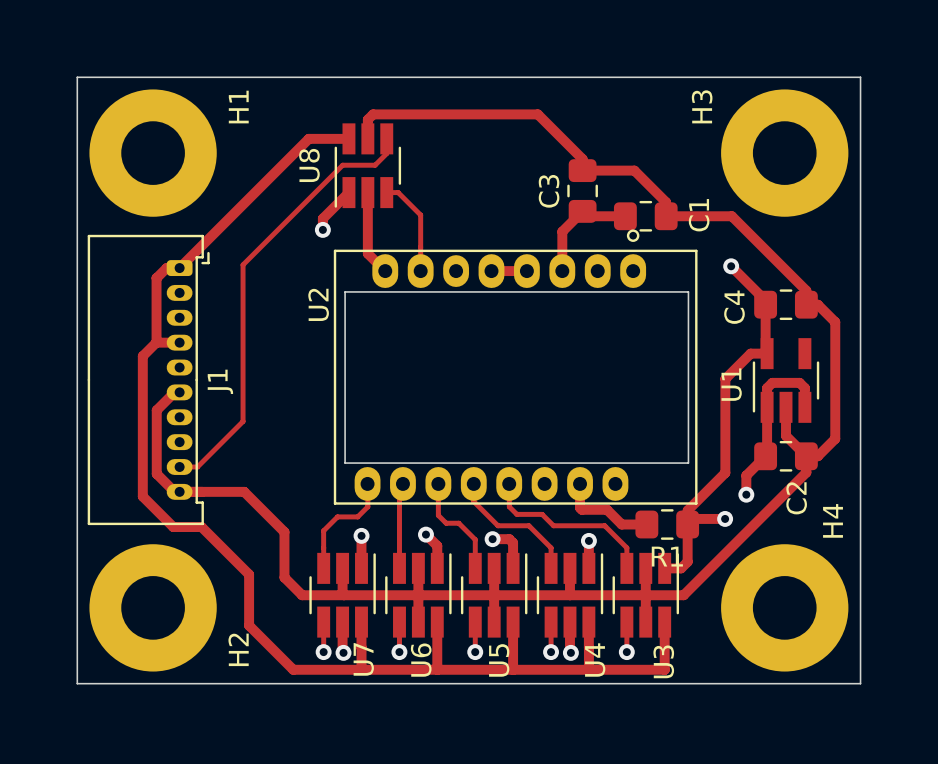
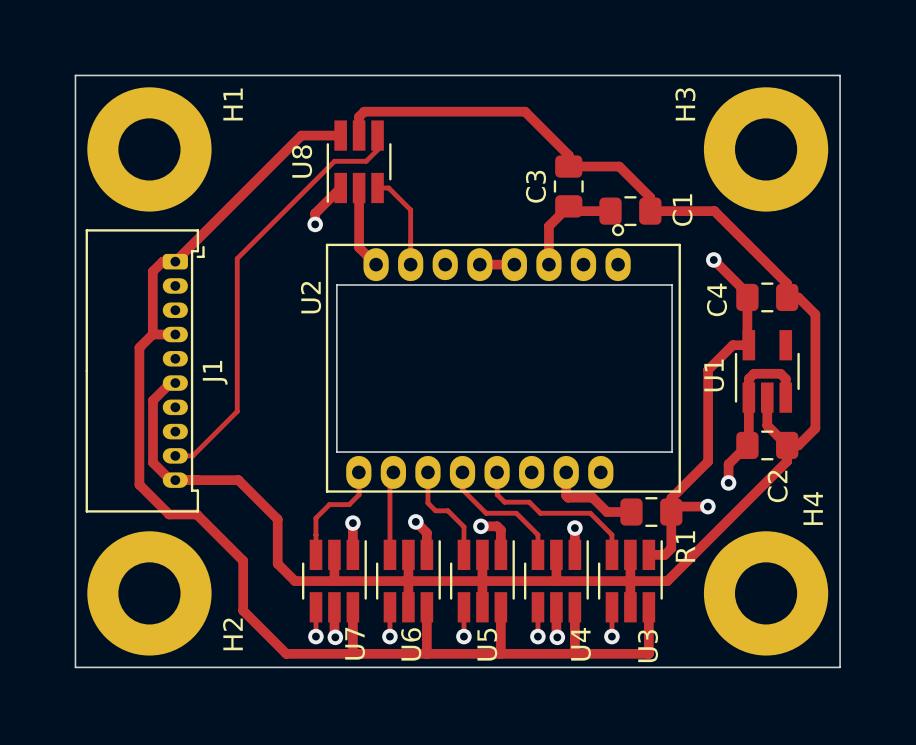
R1 name rotation: 0° (667, 556) -> 90° counterclockwise (685, 546)

